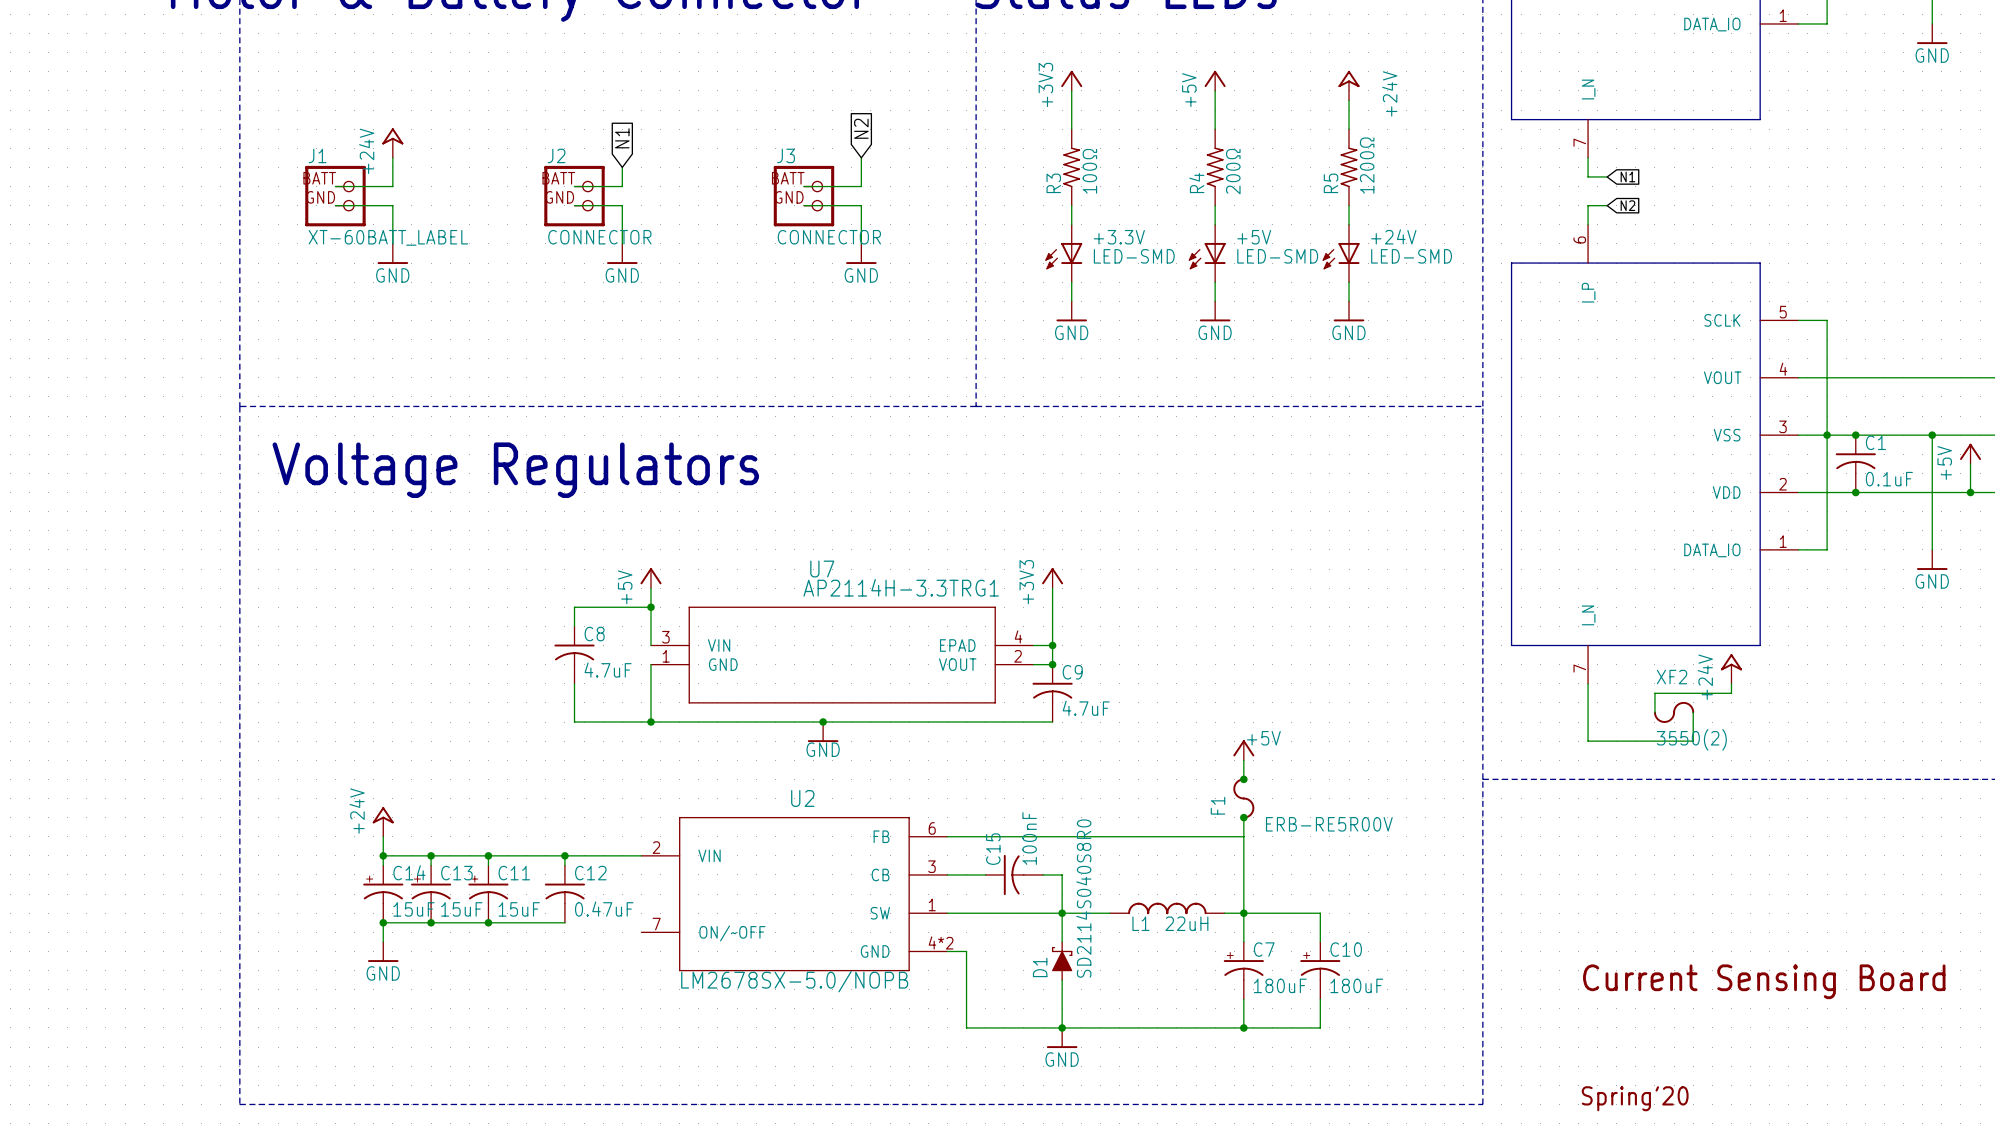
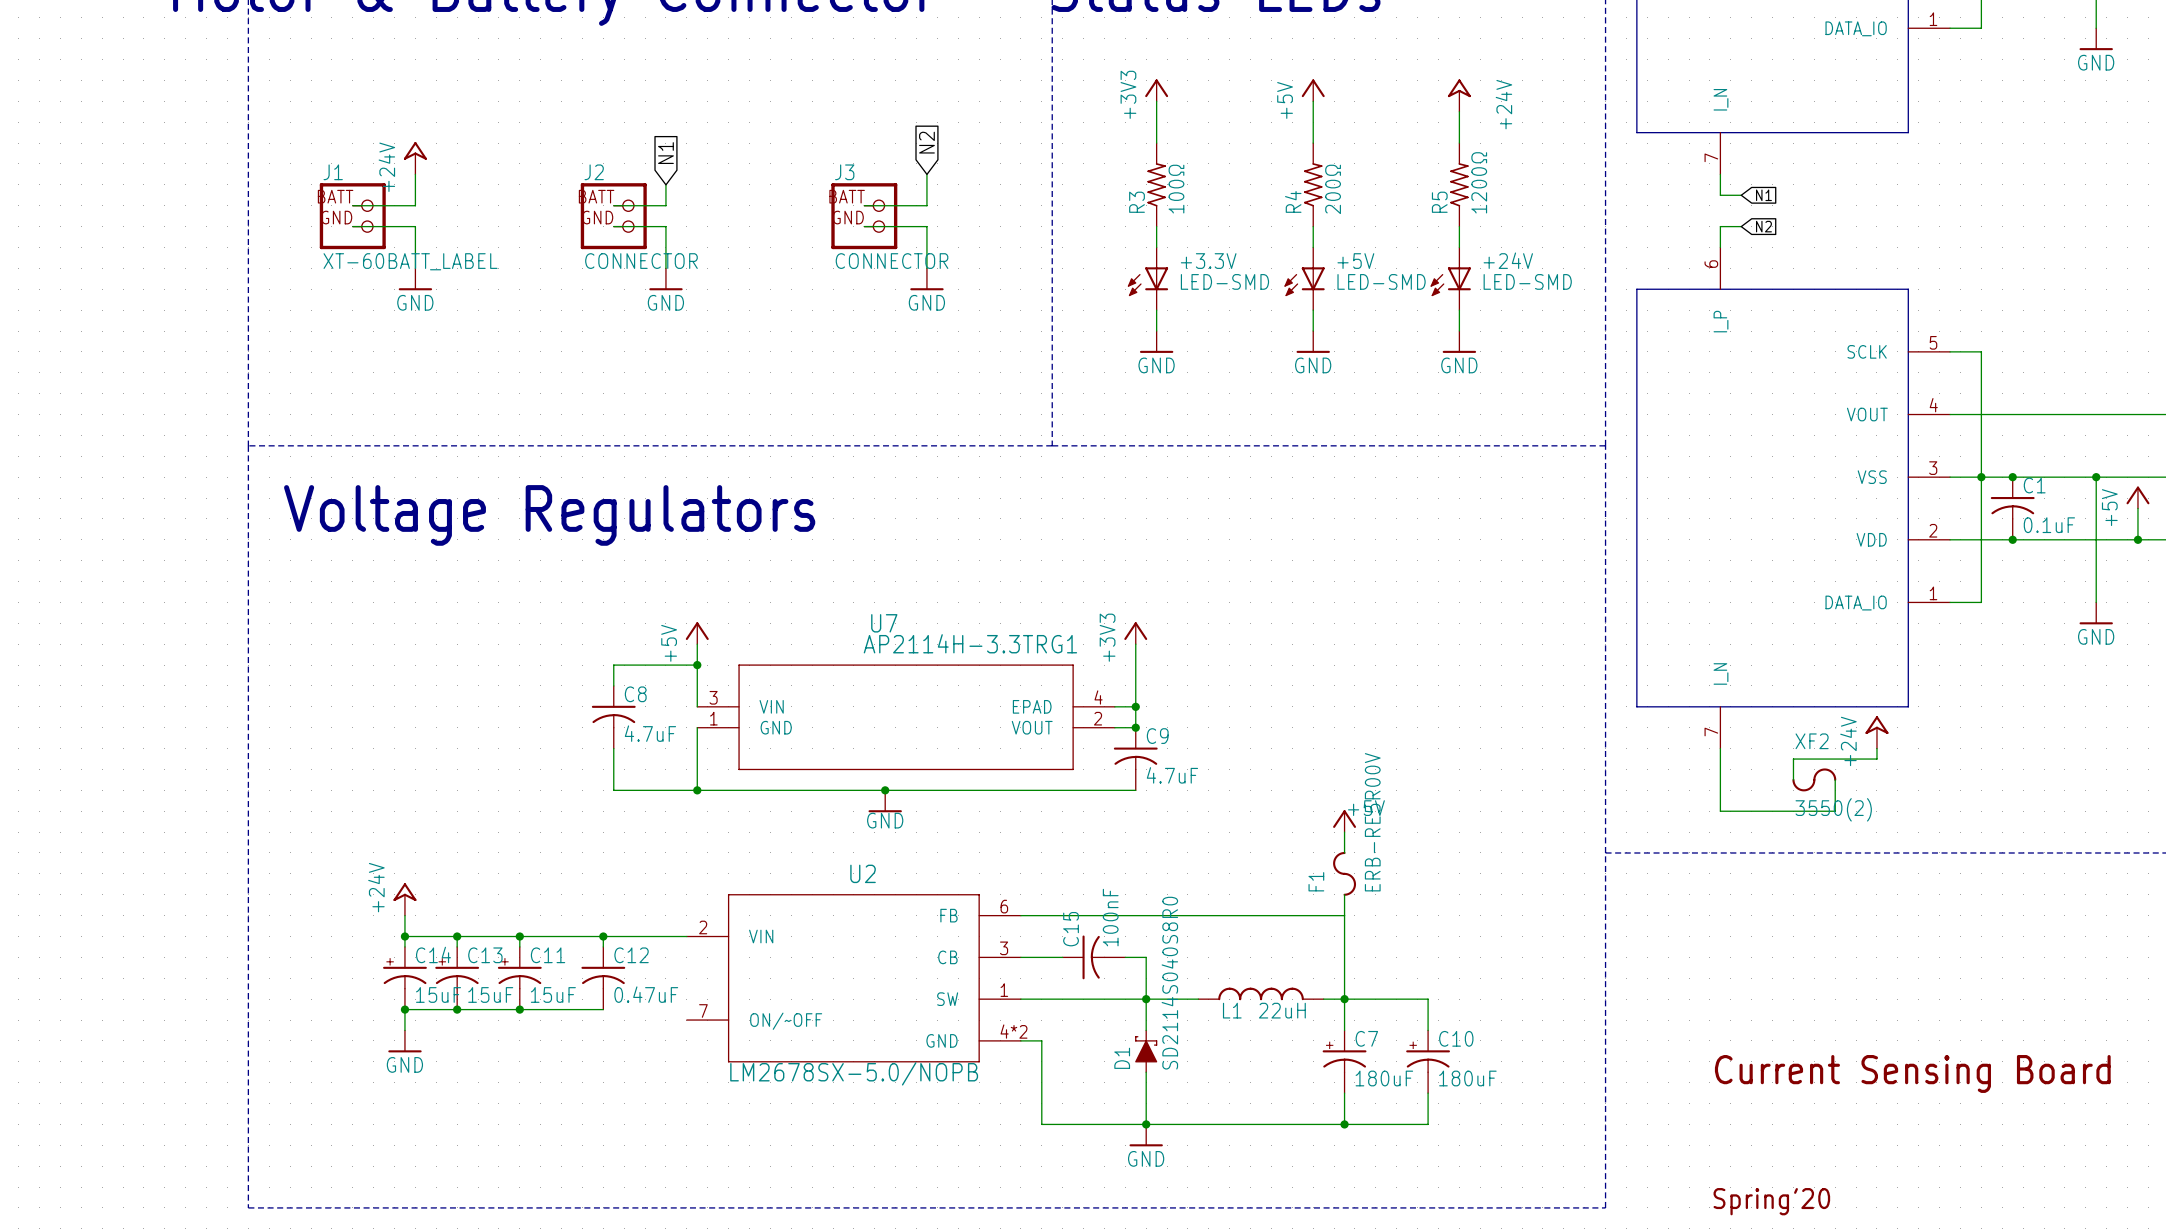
junction: (1243, 779) -> none
junction: (1243, 817) -> none
F1 value rotation: 0° (1329, 824) -> 90° counterclockwise (1372, 822)

